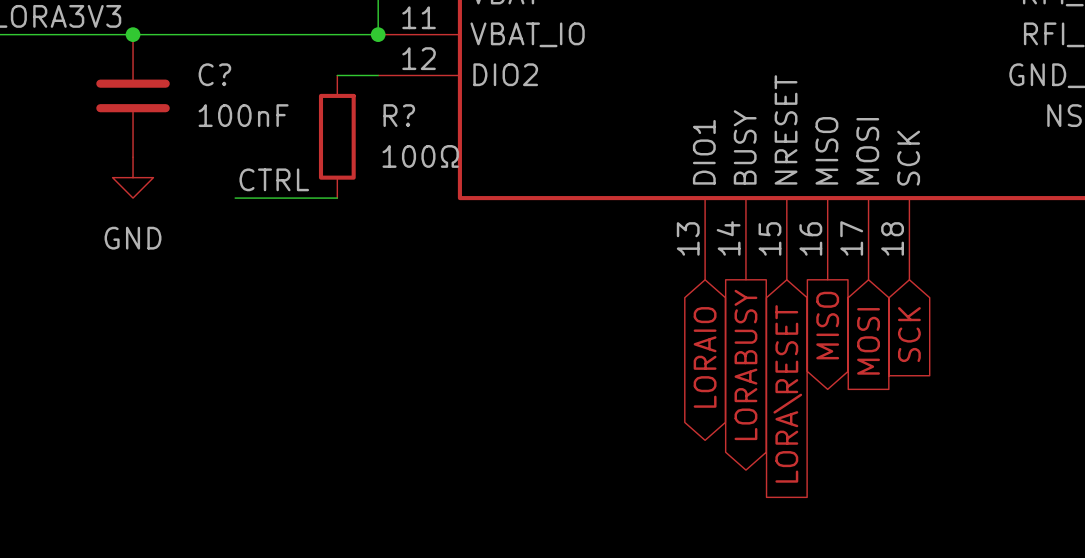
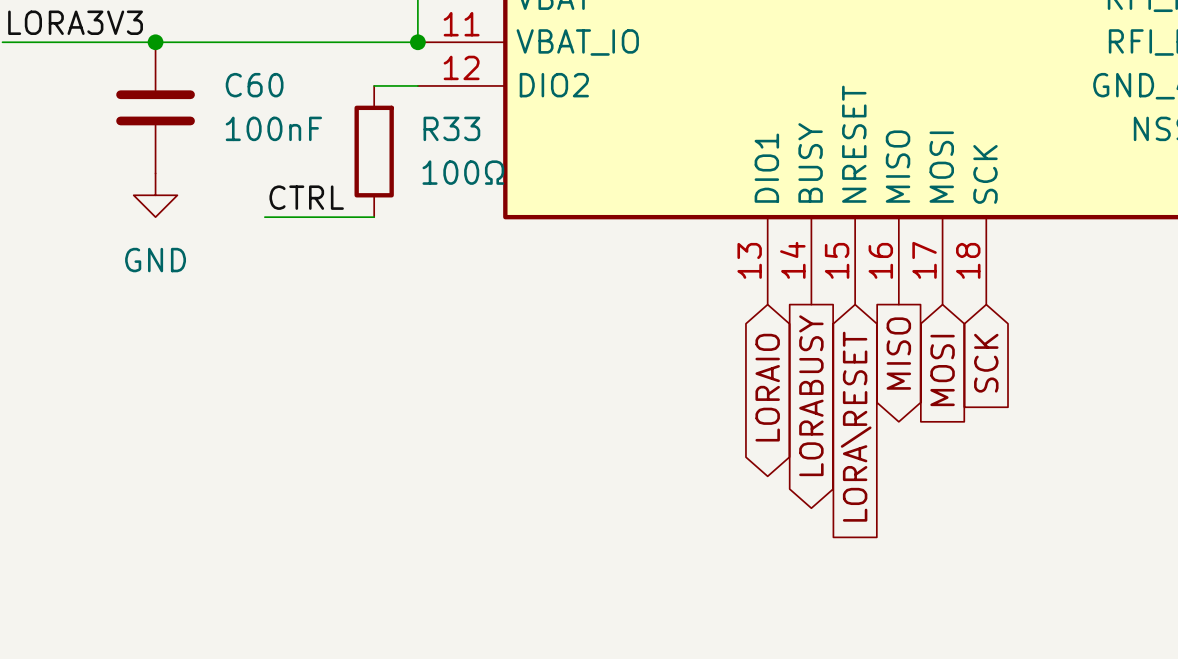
C? name: C? (214, 74) -> C60 (254, 85)
R? name: R? (399, 115) -> R33 (451, 128)

